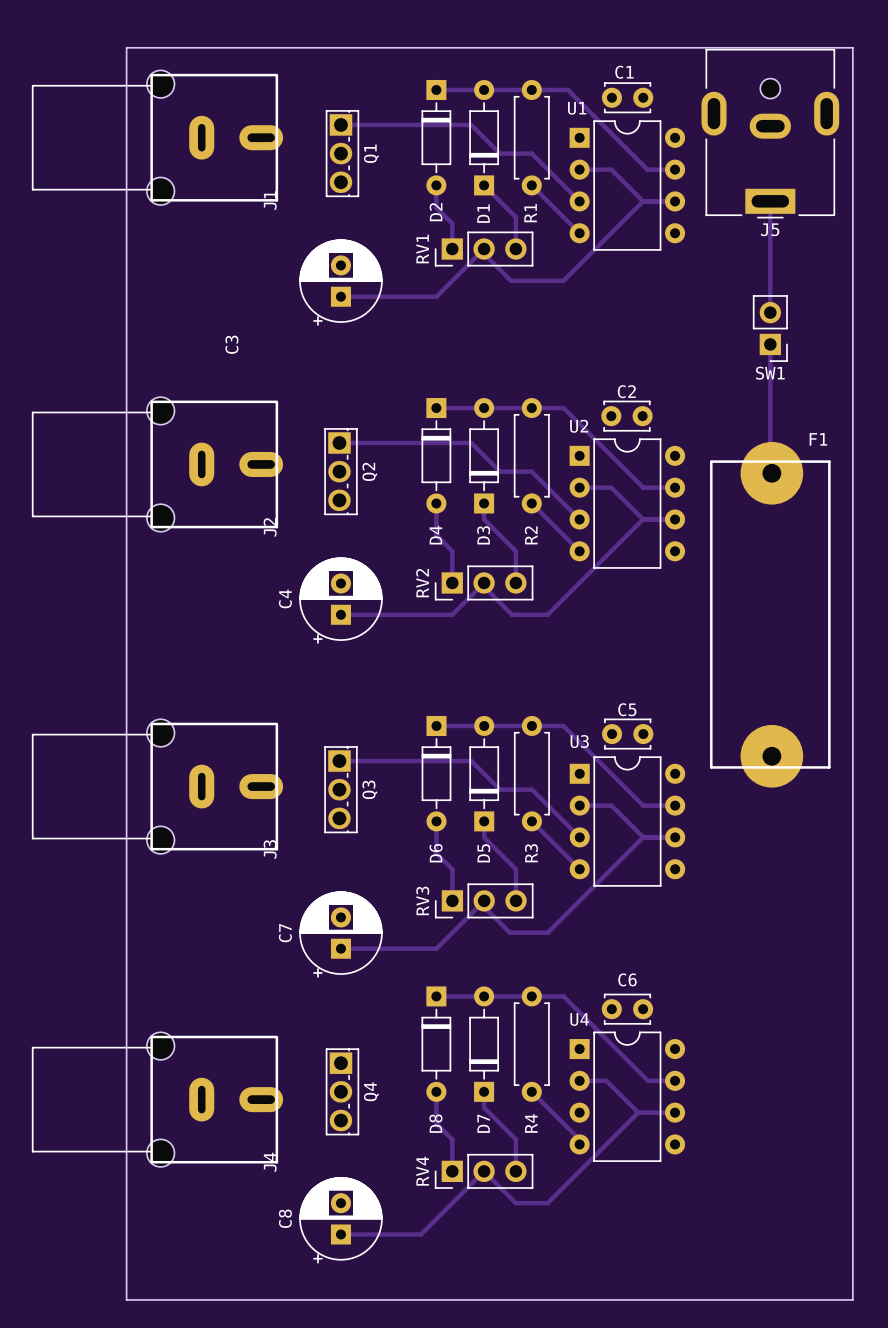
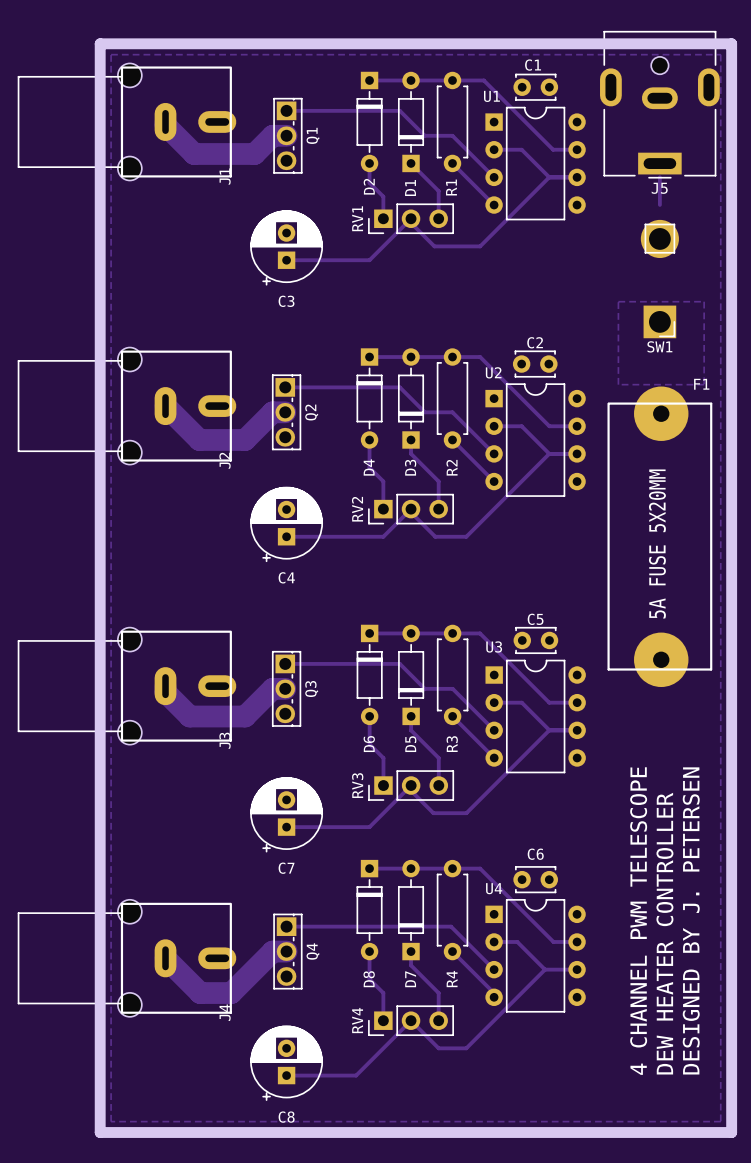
board edge width: thin (126, 47) (852, 47) (852, 1299) (126, 1299) (126, 47) -> thick (100, 43) (731, 43) (731, 1132) (100, 1132) (100, 43)
zone outline: none -> (111, 54) (720, 54) (720, 1121) (111, 1121) (111, 54)
J5 position: (770, 133) -> (659, 104)
track: none -> (165, 121) (165, 125) (194, 153) (254, 153) (272, 135) (286, 135)
track: (770, 233) (770, 312) -> none
SW1 footprint: [752, 295, 788, 362] -> [640, 219, 679, 339]
C3 name rotation: 0° (231, 344) -> 90° clockwise (286, 301)
C3 name position: C3 (231, 344) -> C3 (286, 301)
zone outline: none -> (618, 301) (618, 384) (704, 384) (704, 301) (618, 301)
track: (770, 344) (770, 471) -> none
SW1 name position: SW1 (770, 373) -> SW1 (659, 346)
track: none -> (165, 406) (199, 439) (245, 439) (272, 412) (285, 412)
C4 name rotation: 0° (285, 598) -> 90° clockwise (286, 577)
C4 name position: C4 (285, 598) -> C4 (286, 577)
text: none -> 5A FUSE 5X20MM (657, 543)
track: none -> (165, 686) (165, 692) (189, 716) (245, 716) (272, 688) (285, 688)
C7 name rotation: 0° (285, 933) -> 90° clockwise (286, 868)
C7 name position: C7 (285, 933) -> C7 (286, 868)
text: none -> 4 CHANNEL PWM TELESCOPE (638, 921)
text: none -> DESIGNED BY J. PETERSEN (691, 920)
track: none -> (286, 926) (451, 926) (494, 969)
text: none -> DEW HEATER CONTROLLER (664, 933)
track: none -> (286, 951) (272, 951) (231, 993) (200, 993) (165, 958)
C8 name rotation: 0° (285, 1218) -> 90° clockwise (286, 1117)
C8 name position: C8 (285, 1218) -> C8 (286, 1117)

